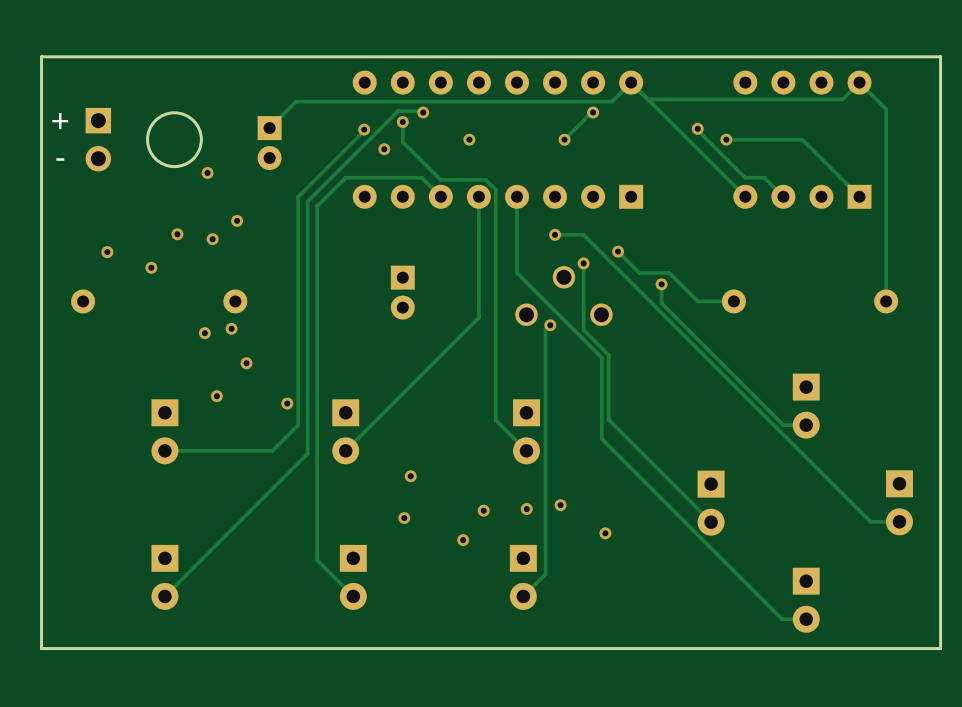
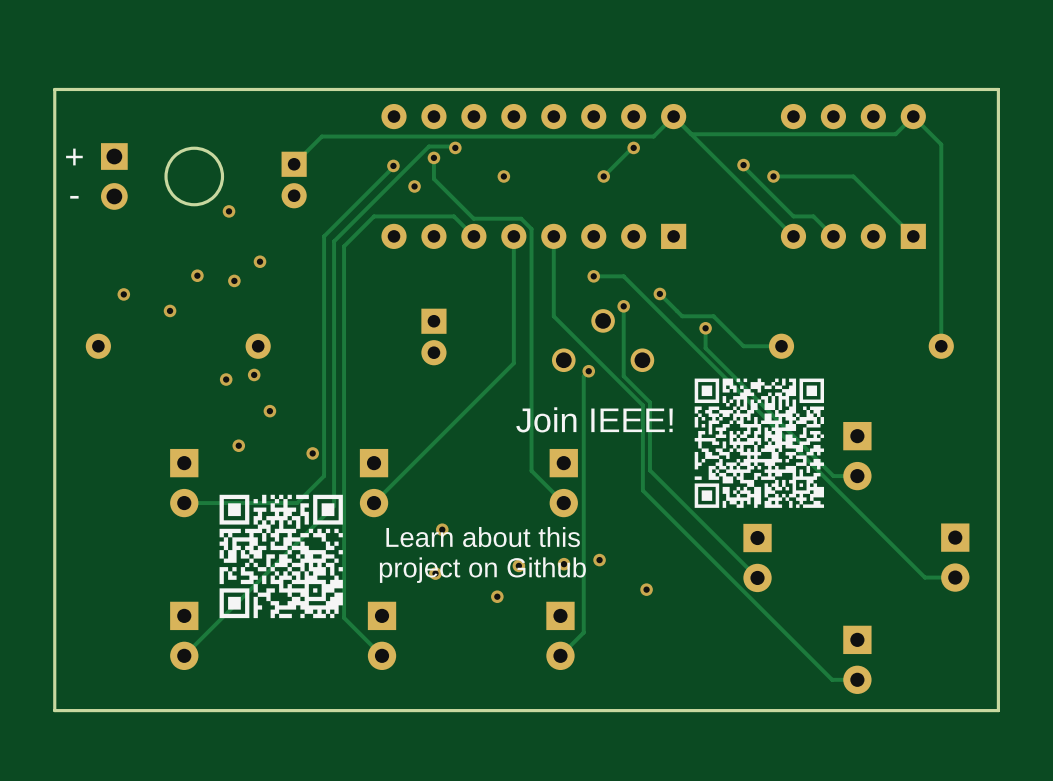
drawing: none -> [694, 378, 825, 508]
text: none -> Join IEEE! (594, 419)
drawing: none -> [219, 494, 343, 619]
text: none -> Learn about this (483, 537)
text: none -> project on Github (482, 570)

